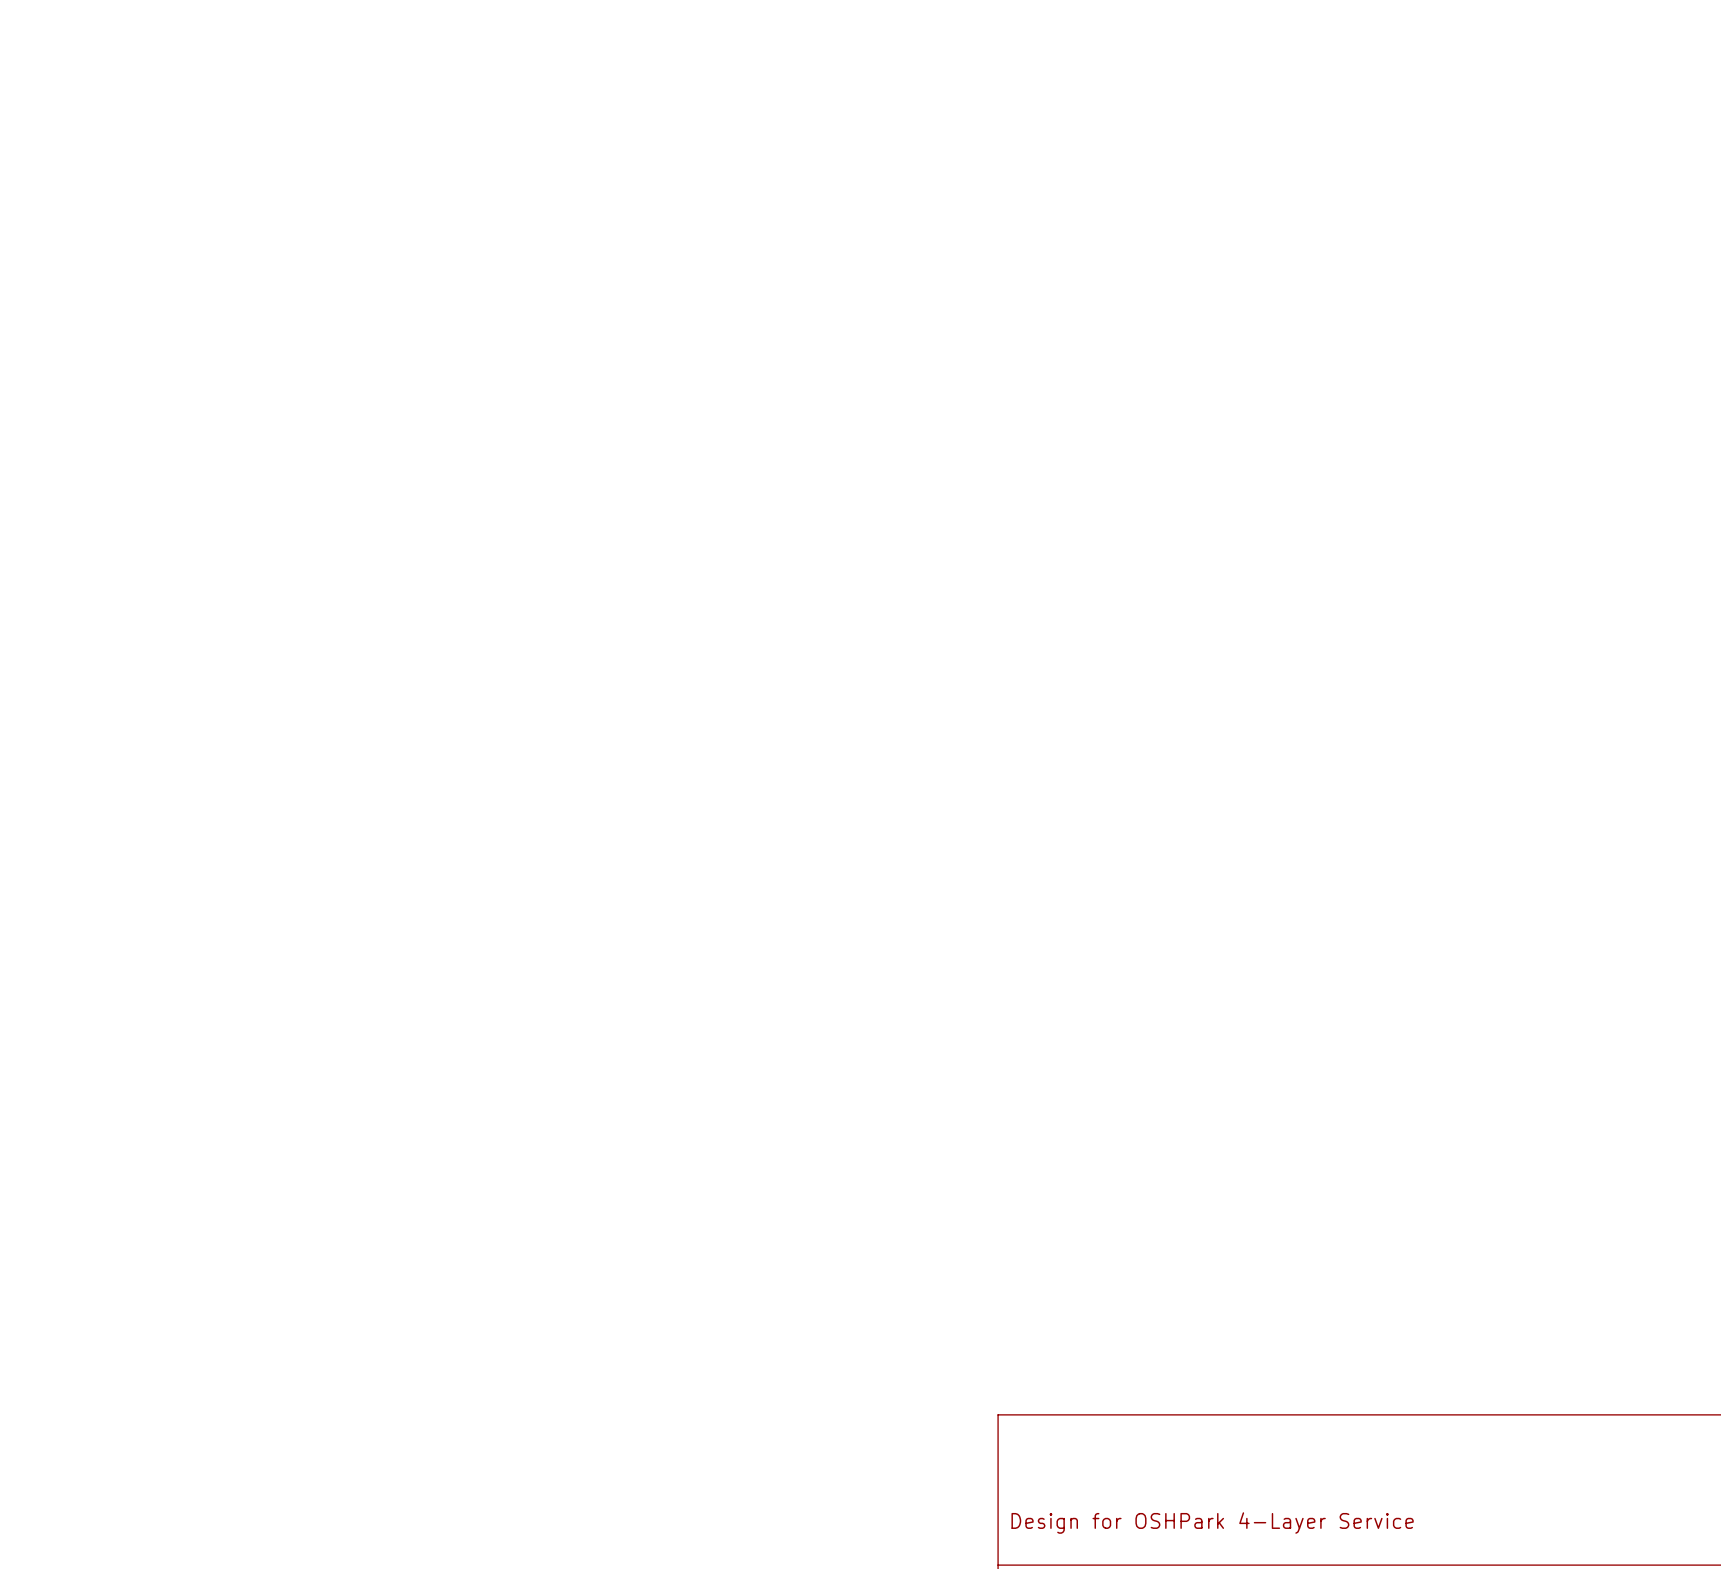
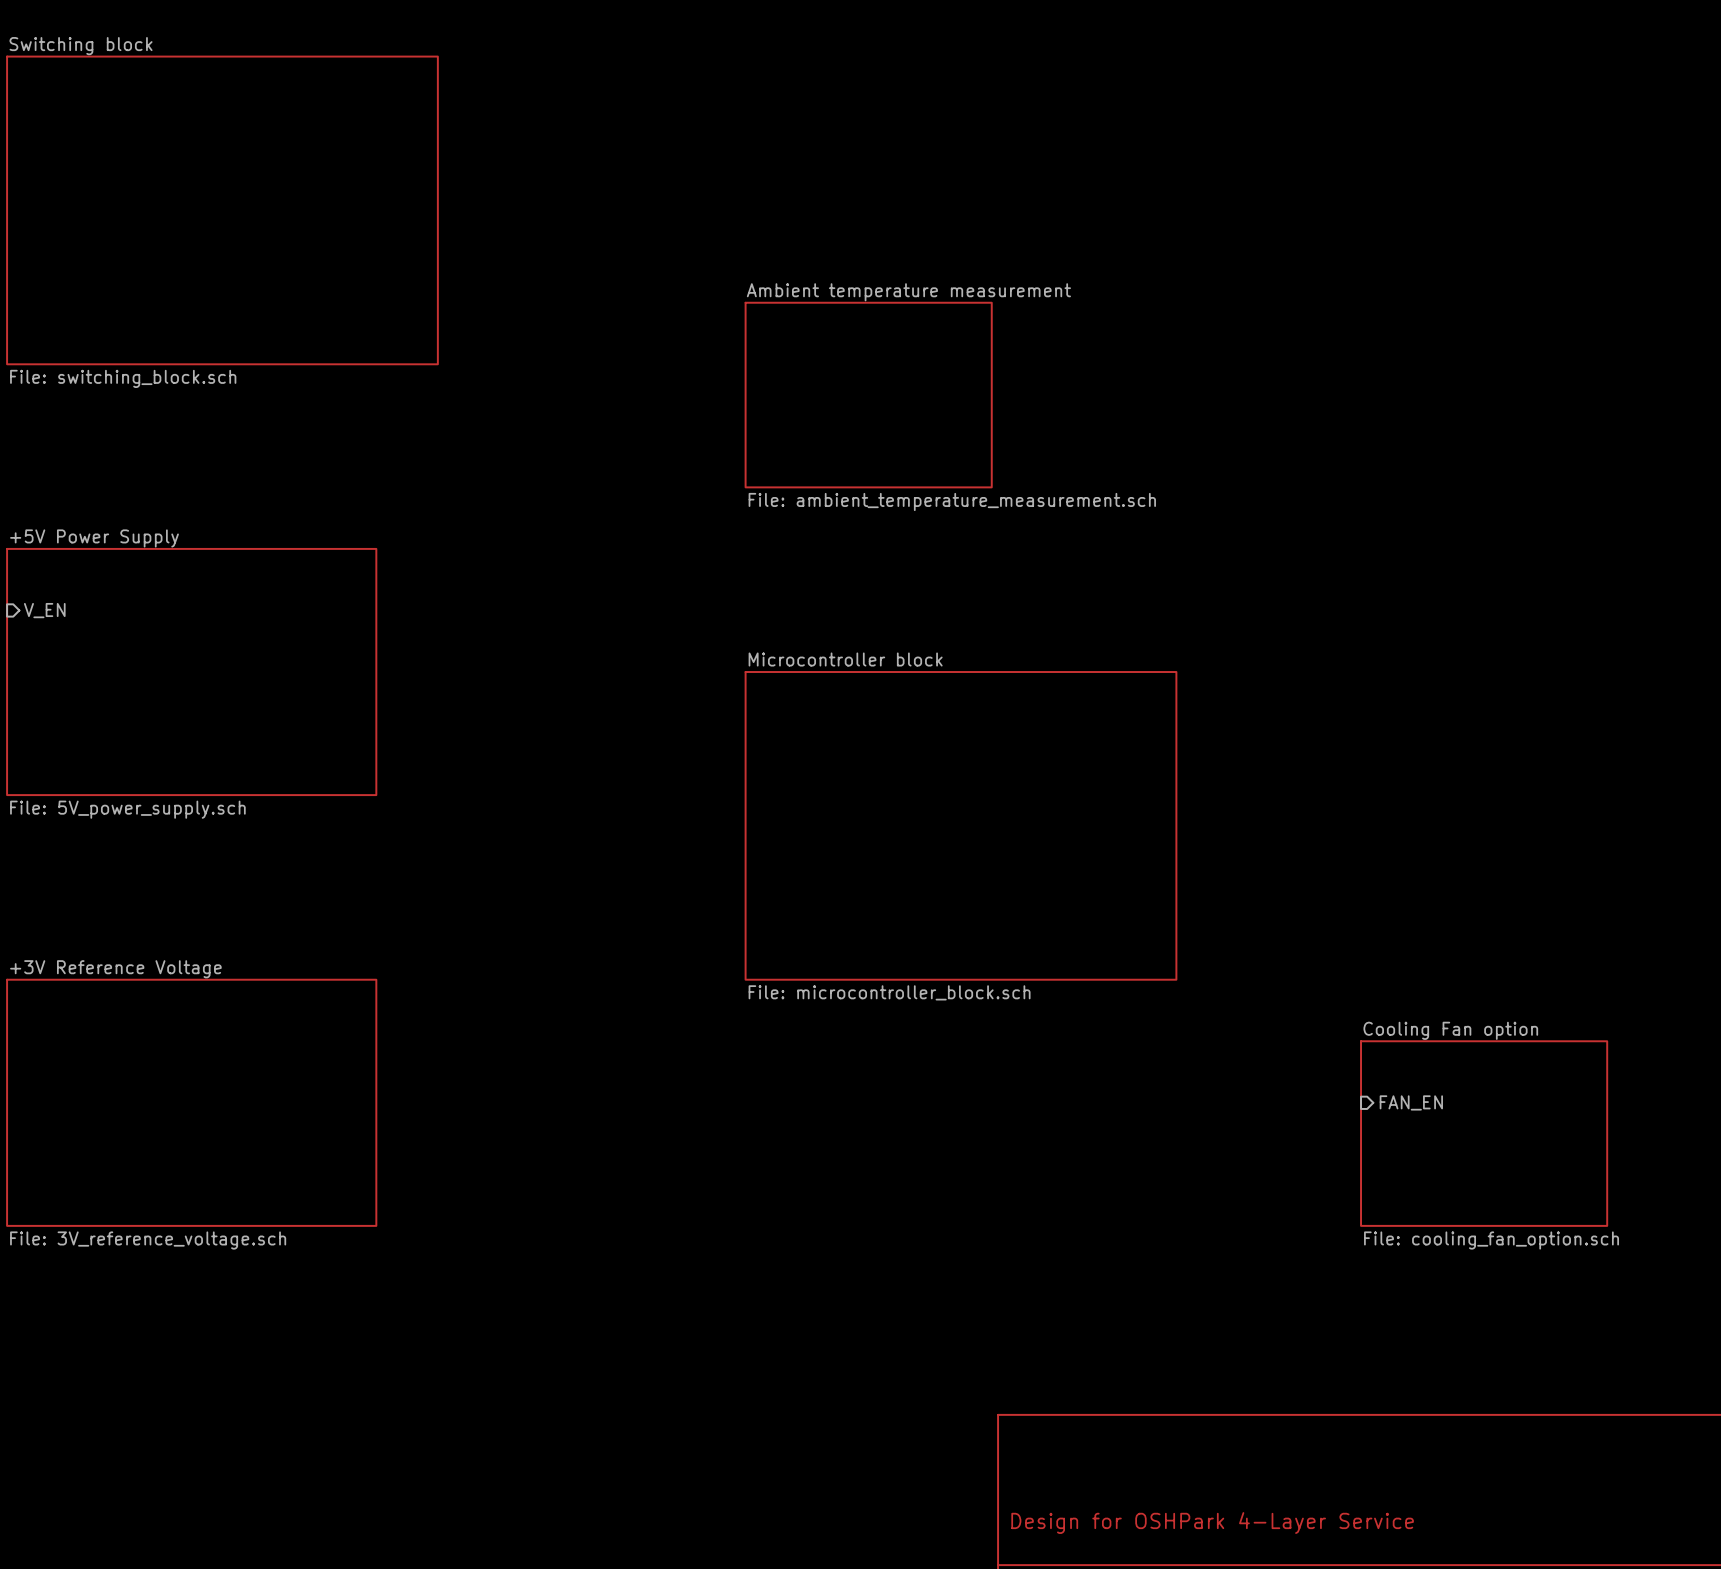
sheet Switching block: none -> File: switching_block.sch (222, 210)
sheet Ambient temperature measurement: none -> File: ambient_temperature_measurement.sch (868, 395)
sheet pin: none -> V_EN (44, 610)
sheet +5V Power Supply: none -> File: 5V_power_supply.sch (191, 672)
sheet Microcontroller block: none -> File: microcontroller_block.sch (960, 825)
sheet +3V Reference Voltage: none -> File: 3V_reference_voltage.sch (191, 1102)
sheet pin: none -> FAN_EN (1411, 1102)
sheet Cooling Fan option: none -> File: cooling_fan_option.sch (1484, 1133)

